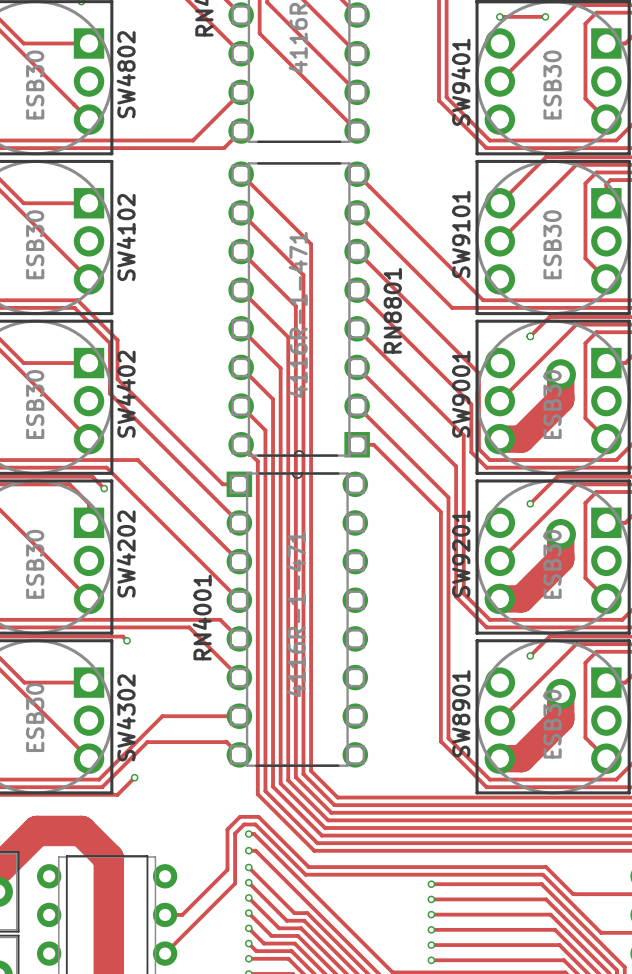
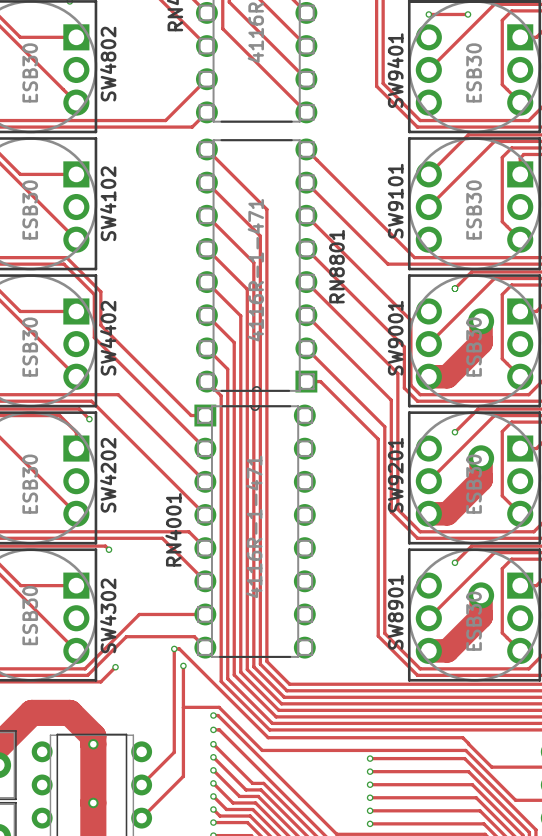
via: none -> (174, 648)
via: none -> (183, 665)
track: (244, 824) (235, 833) (235, 883) (213, 904) -> (183, 665) (183, 776)
track: none -> (209, 707) (183, 707)
via: none -> (93, 744)
track: (546, 867) (308, 867) (258, 816) (240, 816) (227, 829) (227, 869) (182, 914) (165, 914) -> (468, 743) (462, 737) (268, 737) (179, 648) (174, 648) (174, 752) (141, 784)
via: none -> (93, 802)

